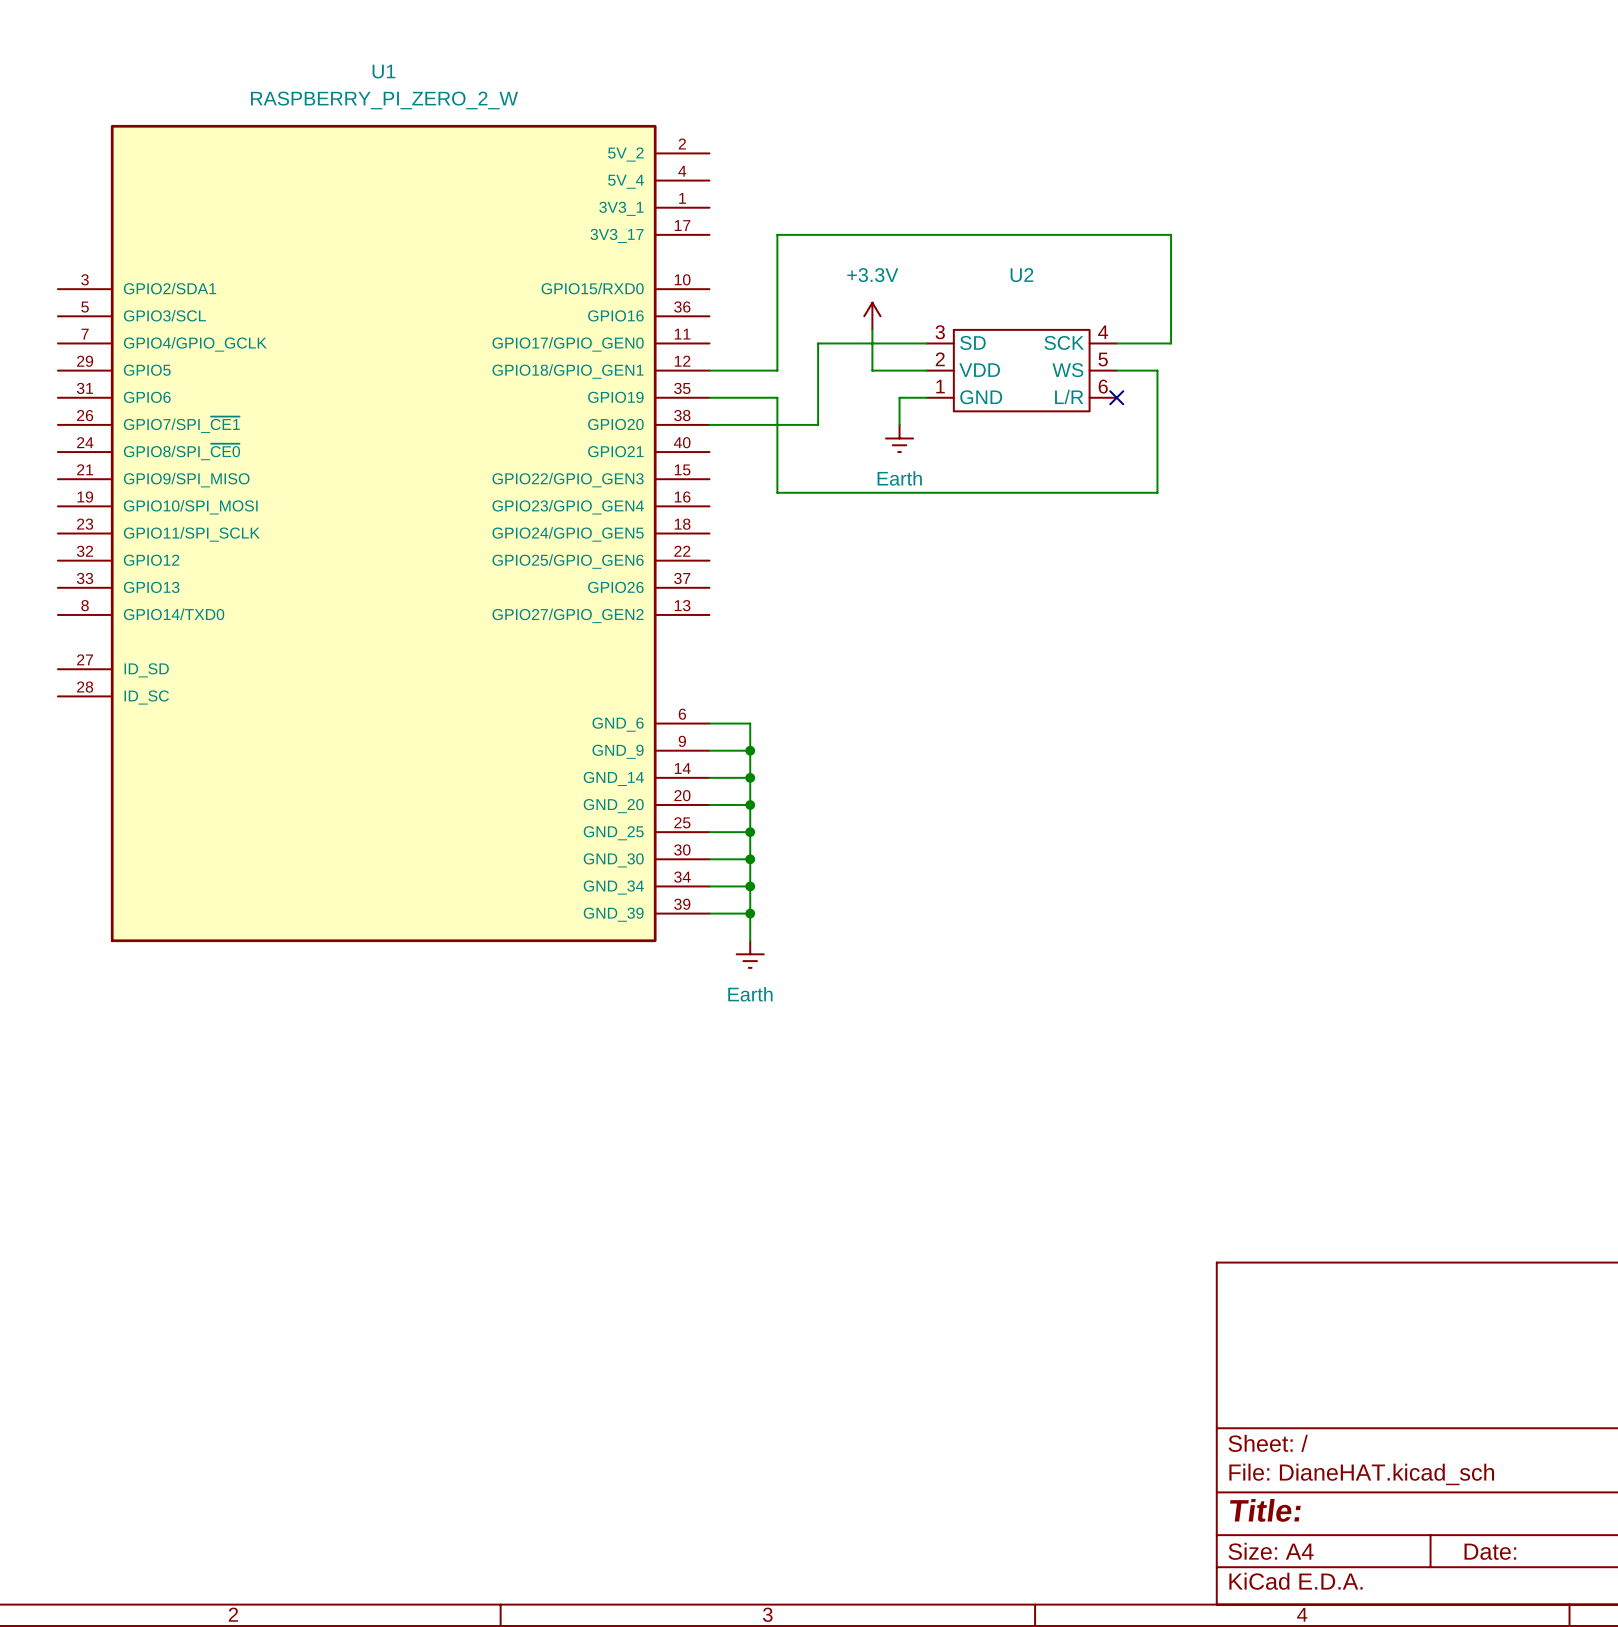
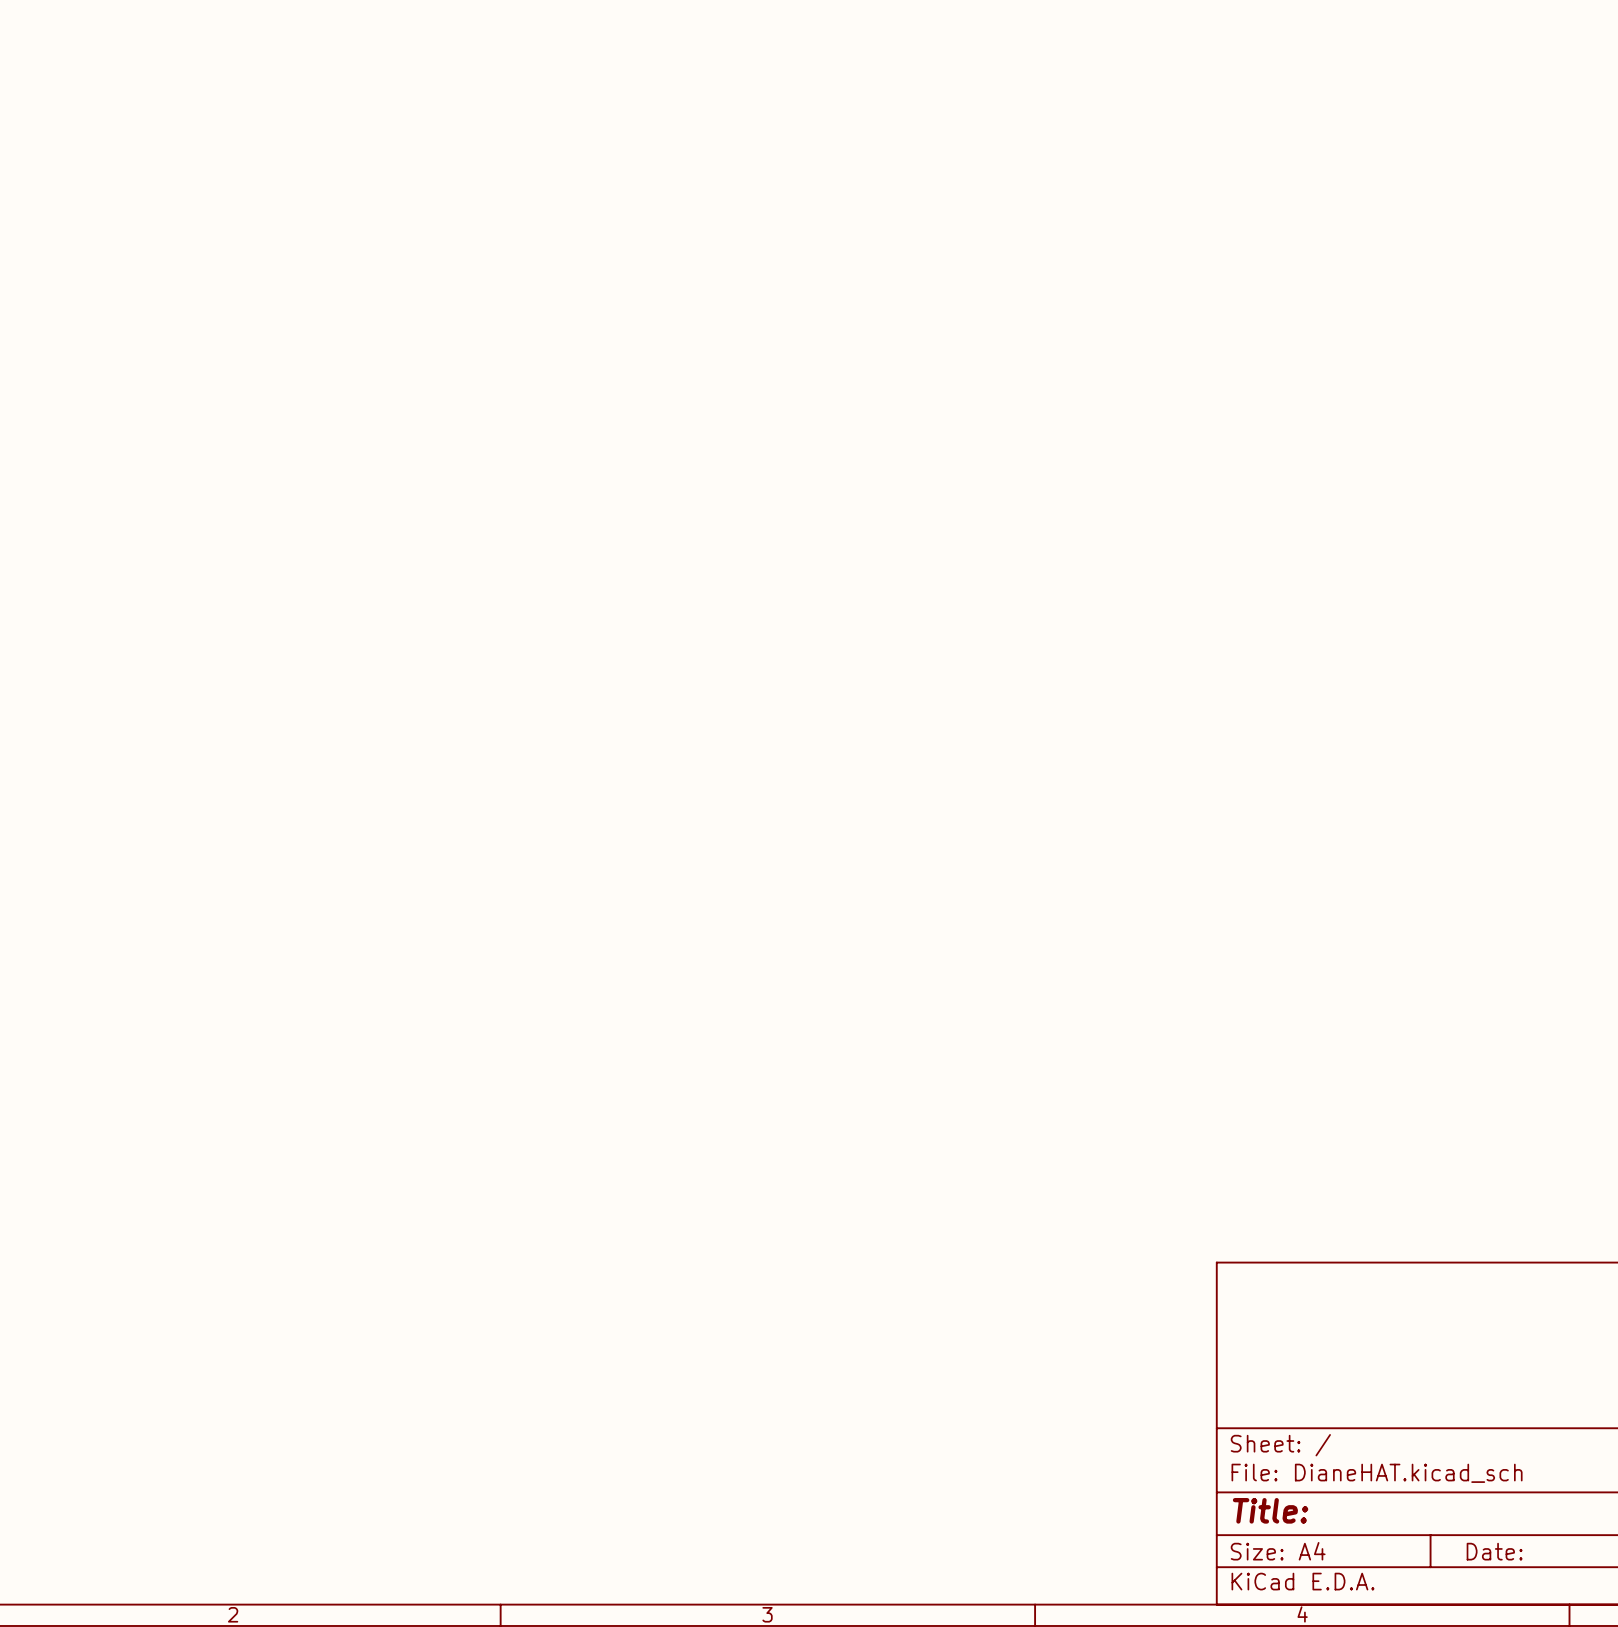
power symbol: +3.3V (872, 316) -> none
wire: (872, 329) (872, 370) (926, 370) -> none
wire: (926, 343) (818, 343) (818, 424) (709, 424) -> none
wire: (1116, 343) (1171, 343) (1171, 234) (777, 234) (777, 370) (709, 370) -> none
U2: (1021, 370) -> none
wire: (1116, 370) (1157, 370) (1157, 492) (777, 492) (777, 397) (709, 397) -> none
wire: (926, 397) (899, 397) (899, 424) -> none
no-connect mark: (1116, 397) -> none
power symbol: Earth (899, 438) -> none
U1: RASPBERRY_PI_ZERO_2_W (383, 533) -> none
wire: (709, 723) (750, 723) (750, 940) -> none
wire: (709, 750) (750, 750) -> none
junction: (750, 750) -> none
wire: (709, 777) (750, 777) -> none
junction: (750, 777) -> none
wire: (709, 805) (750, 805) -> none
junction: (750, 805) -> none
wire: (709, 832) (750, 832) -> none
junction: (750, 832) -> none
wire: (709, 859) (750, 859) -> none
junction: (750, 859) -> none
wire: (709, 886) (750, 886) -> none
junction: (750, 886) -> none
wire: (709, 913) (750, 913) -> none
junction: (750, 913) -> none
power symbol: Earth (750, 954) -> none

